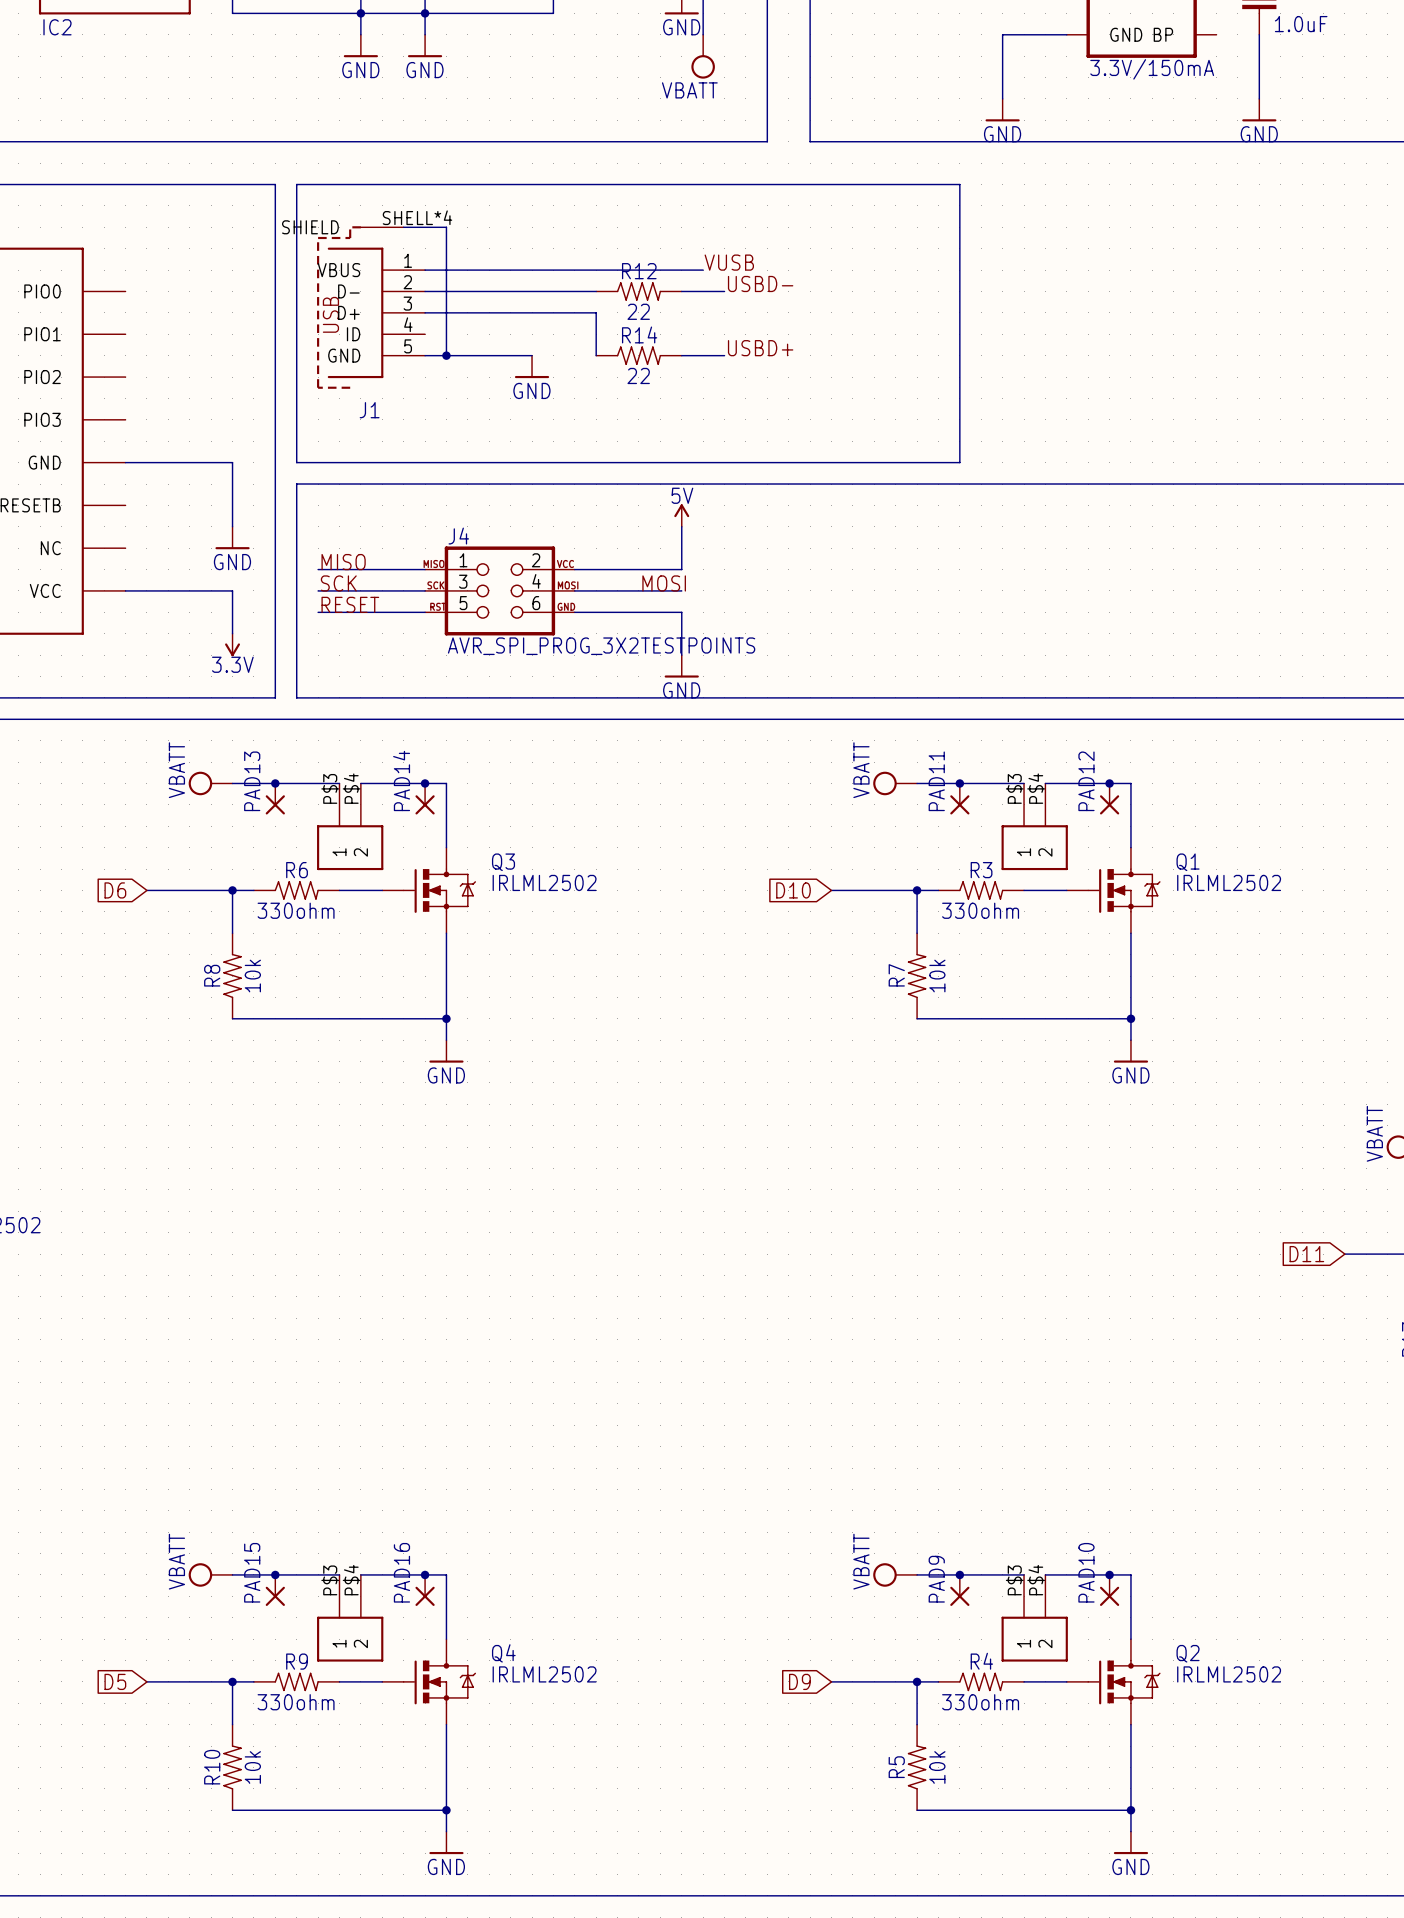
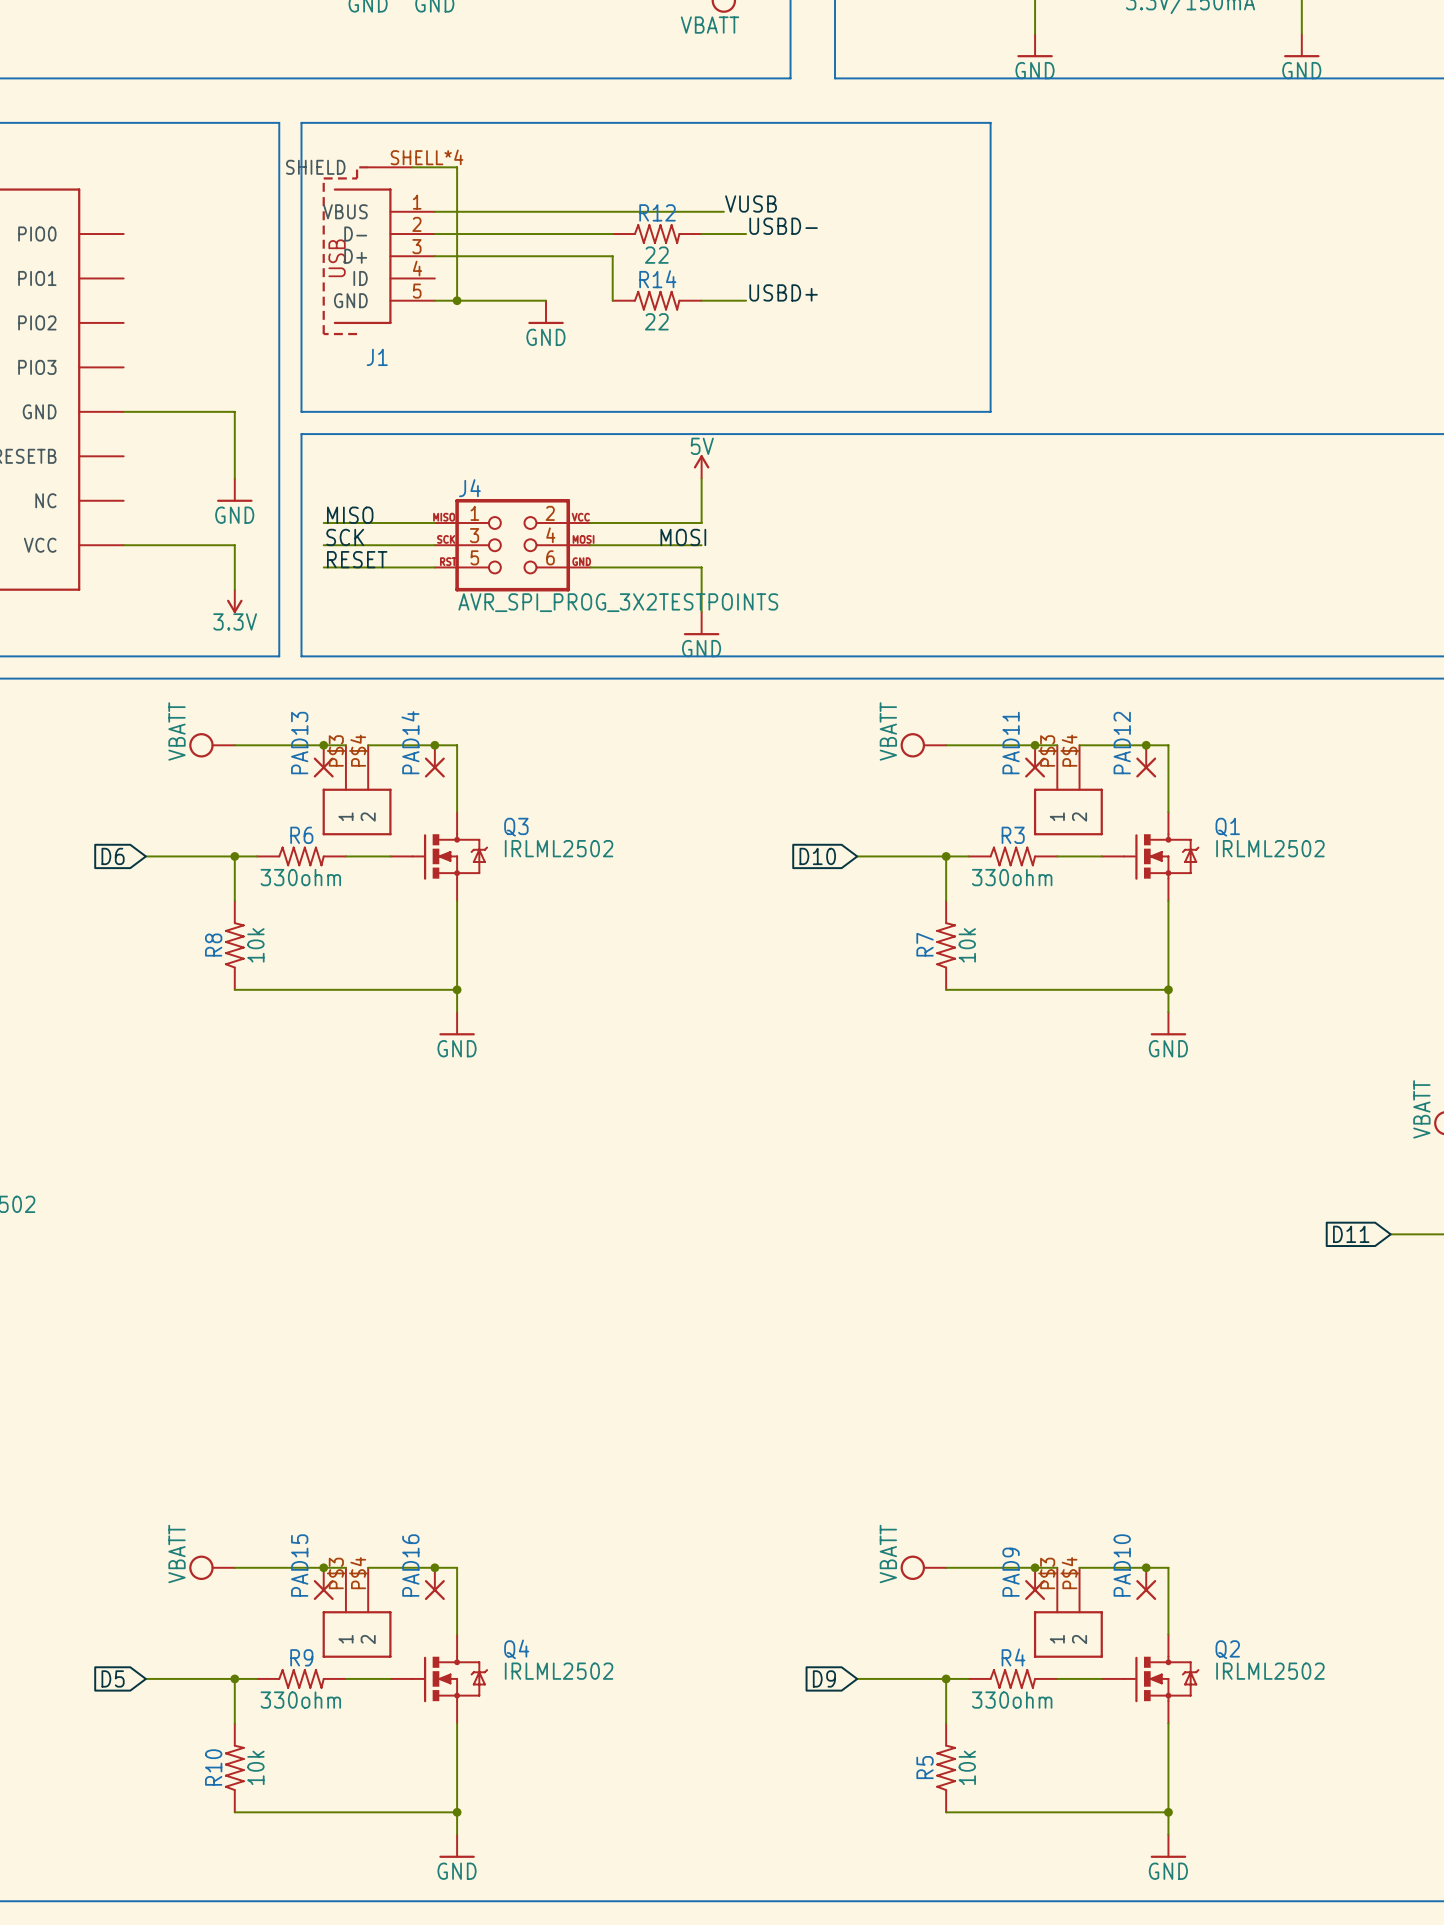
junction position: (275, 783) -> (323, 745)
junction position: (959, 783) -> (1035, 745)
PAD13 position: (275, 798) -> (323, 761)
PAD11 position: (959, 798) -> (1035, 761)
junction position: (275, 1574) -> (323, 1567)
junction position: (959, 1574) -> (1035, 1567)
PAD15 position: (275, 1590) -> (323, 1583)
PAD9 position: (959, 1590) -> (1035, 1583)

